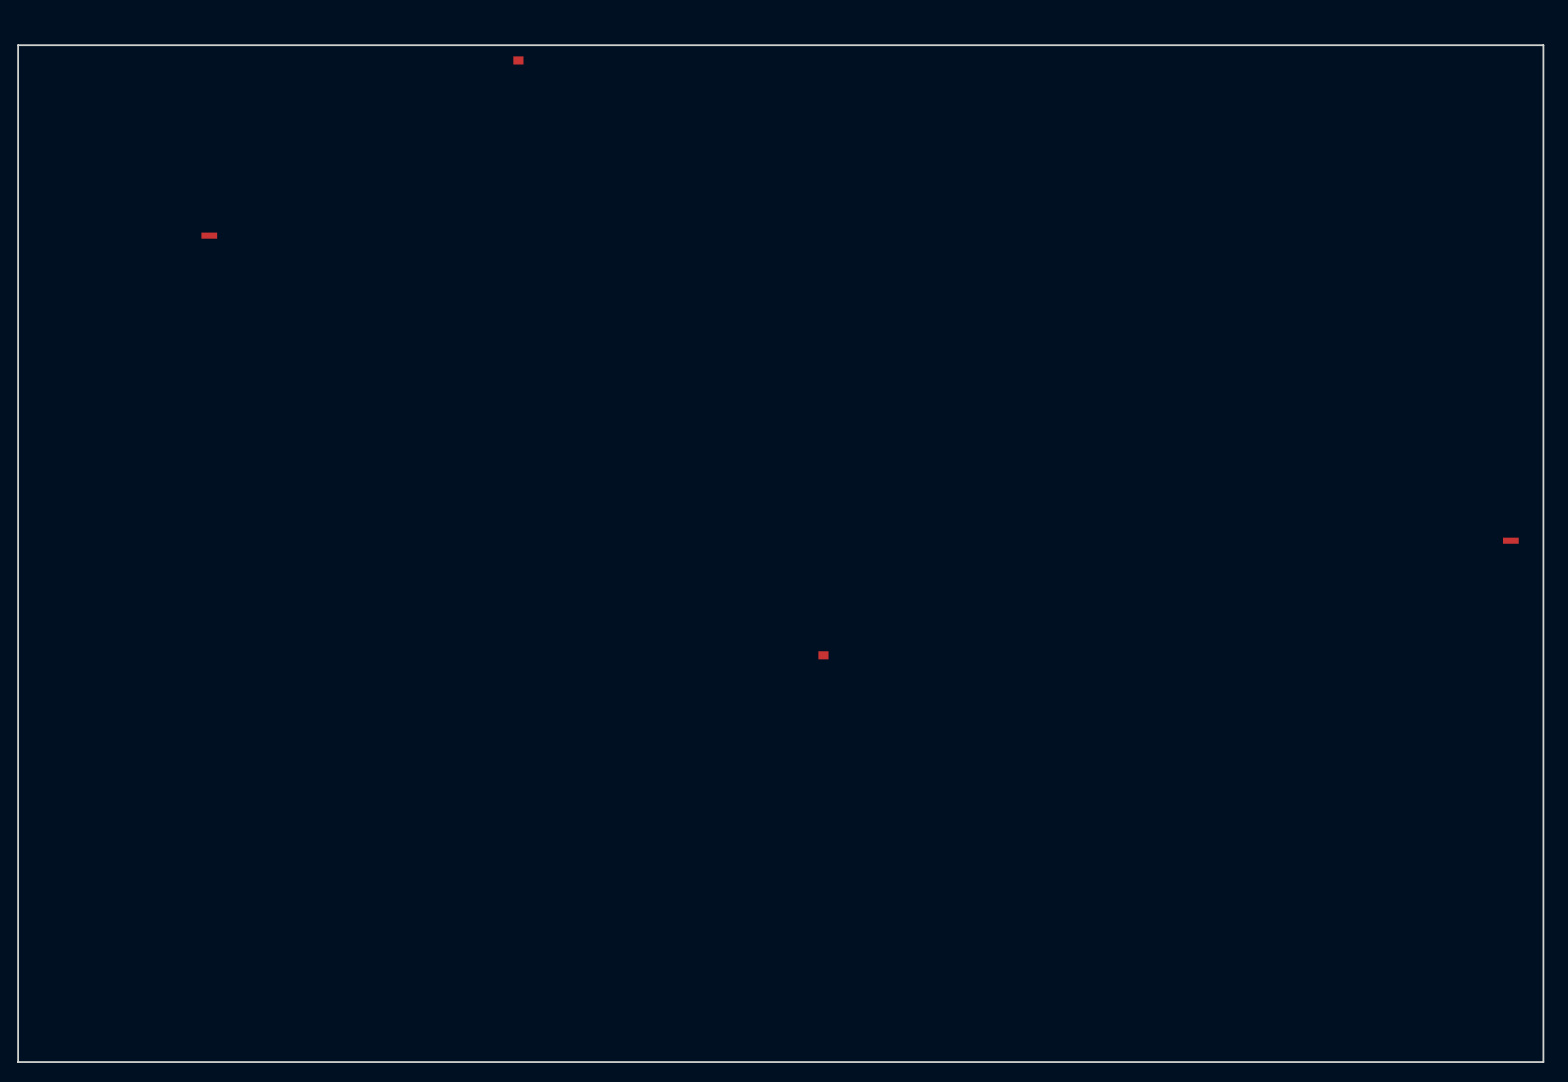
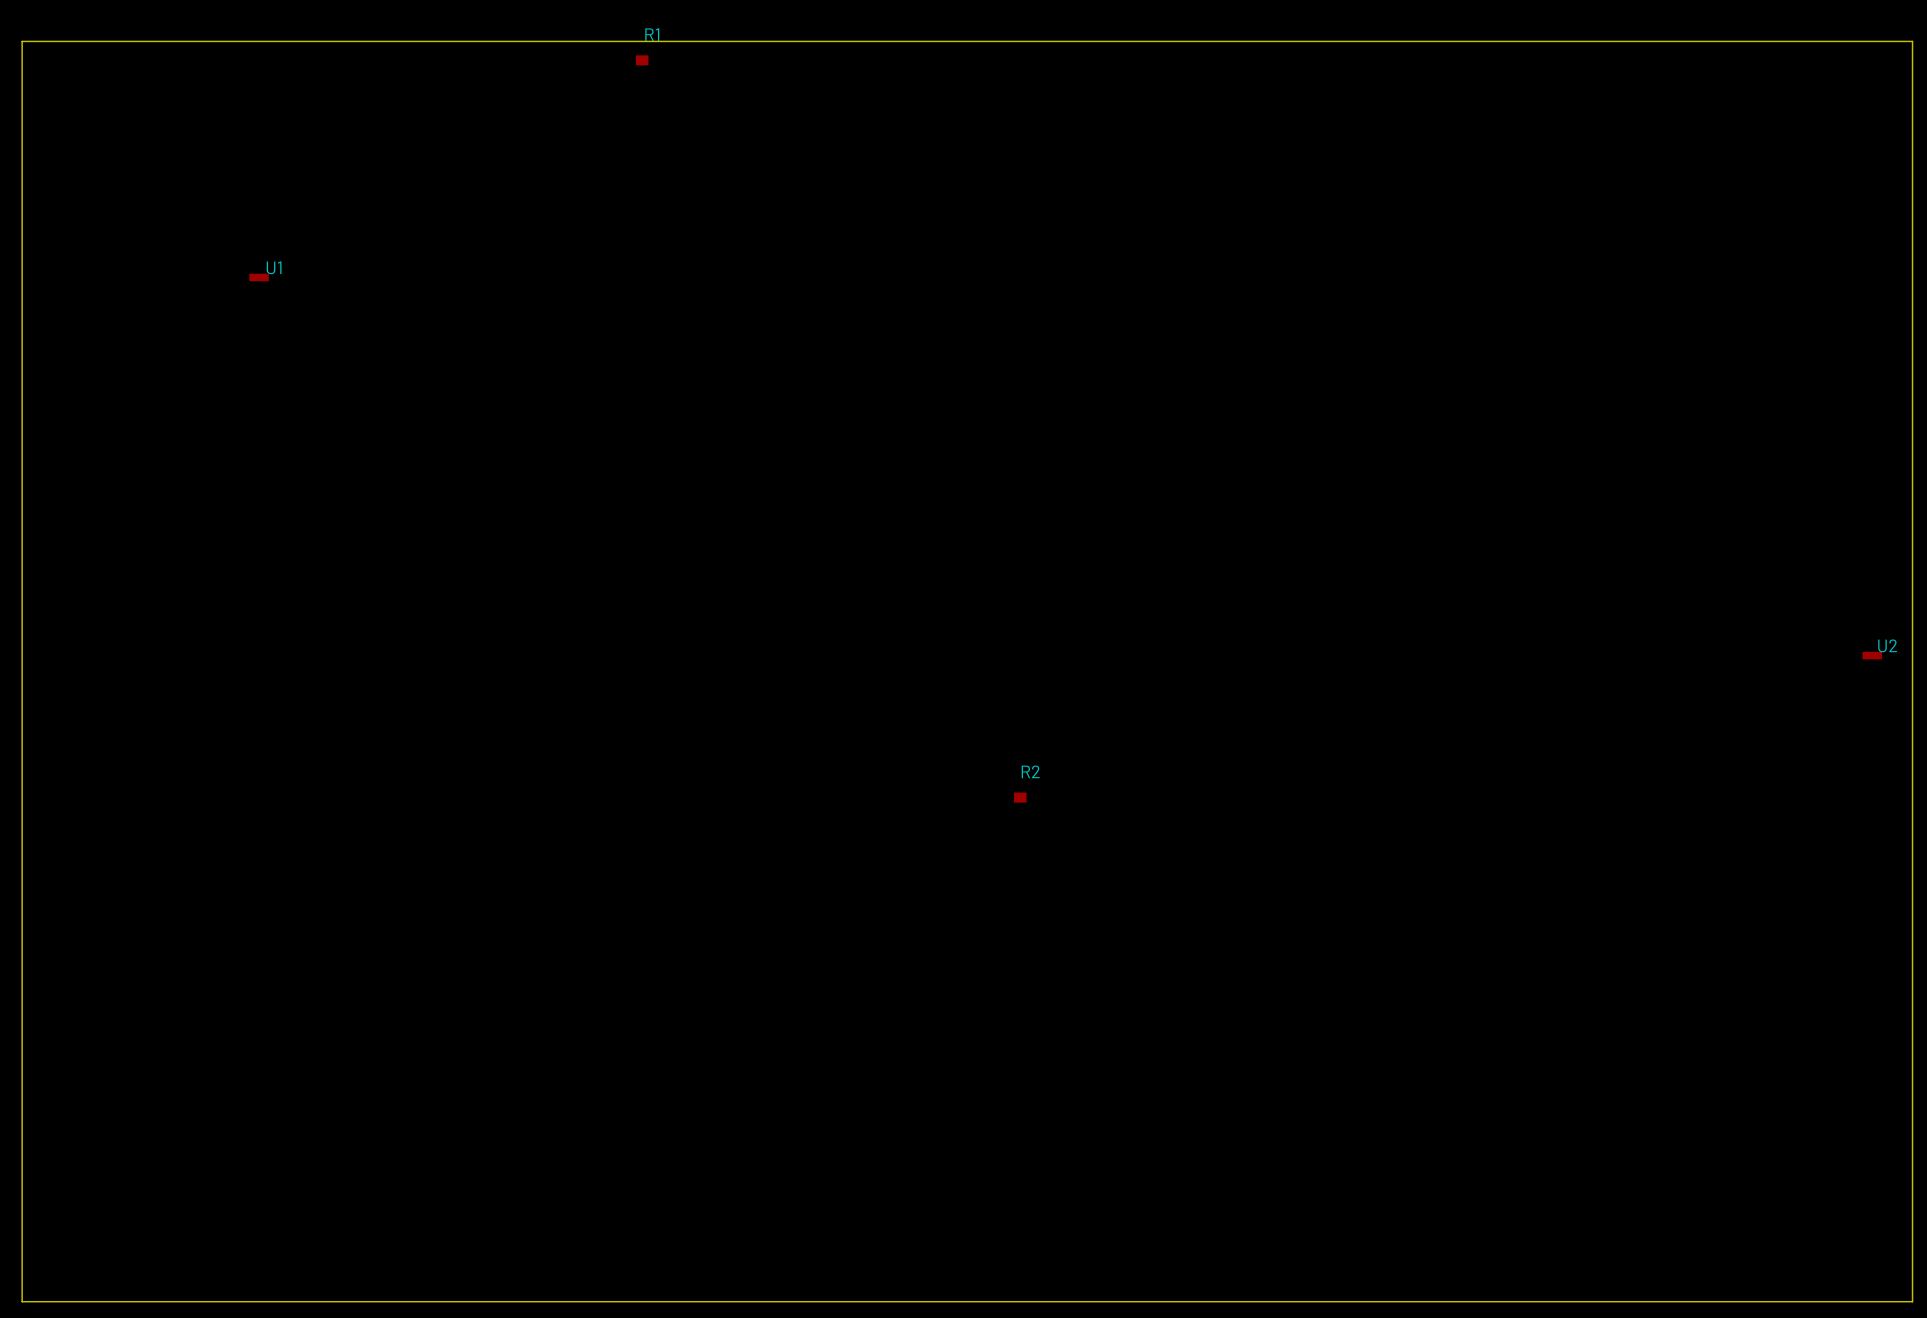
R1 name: none -> R1 (652, 34)
U1 name: none -> U1 (274, 267)
U2 name: none -> U2 (1887, 645)
R2 name: none -> R2 (1030, 771)

